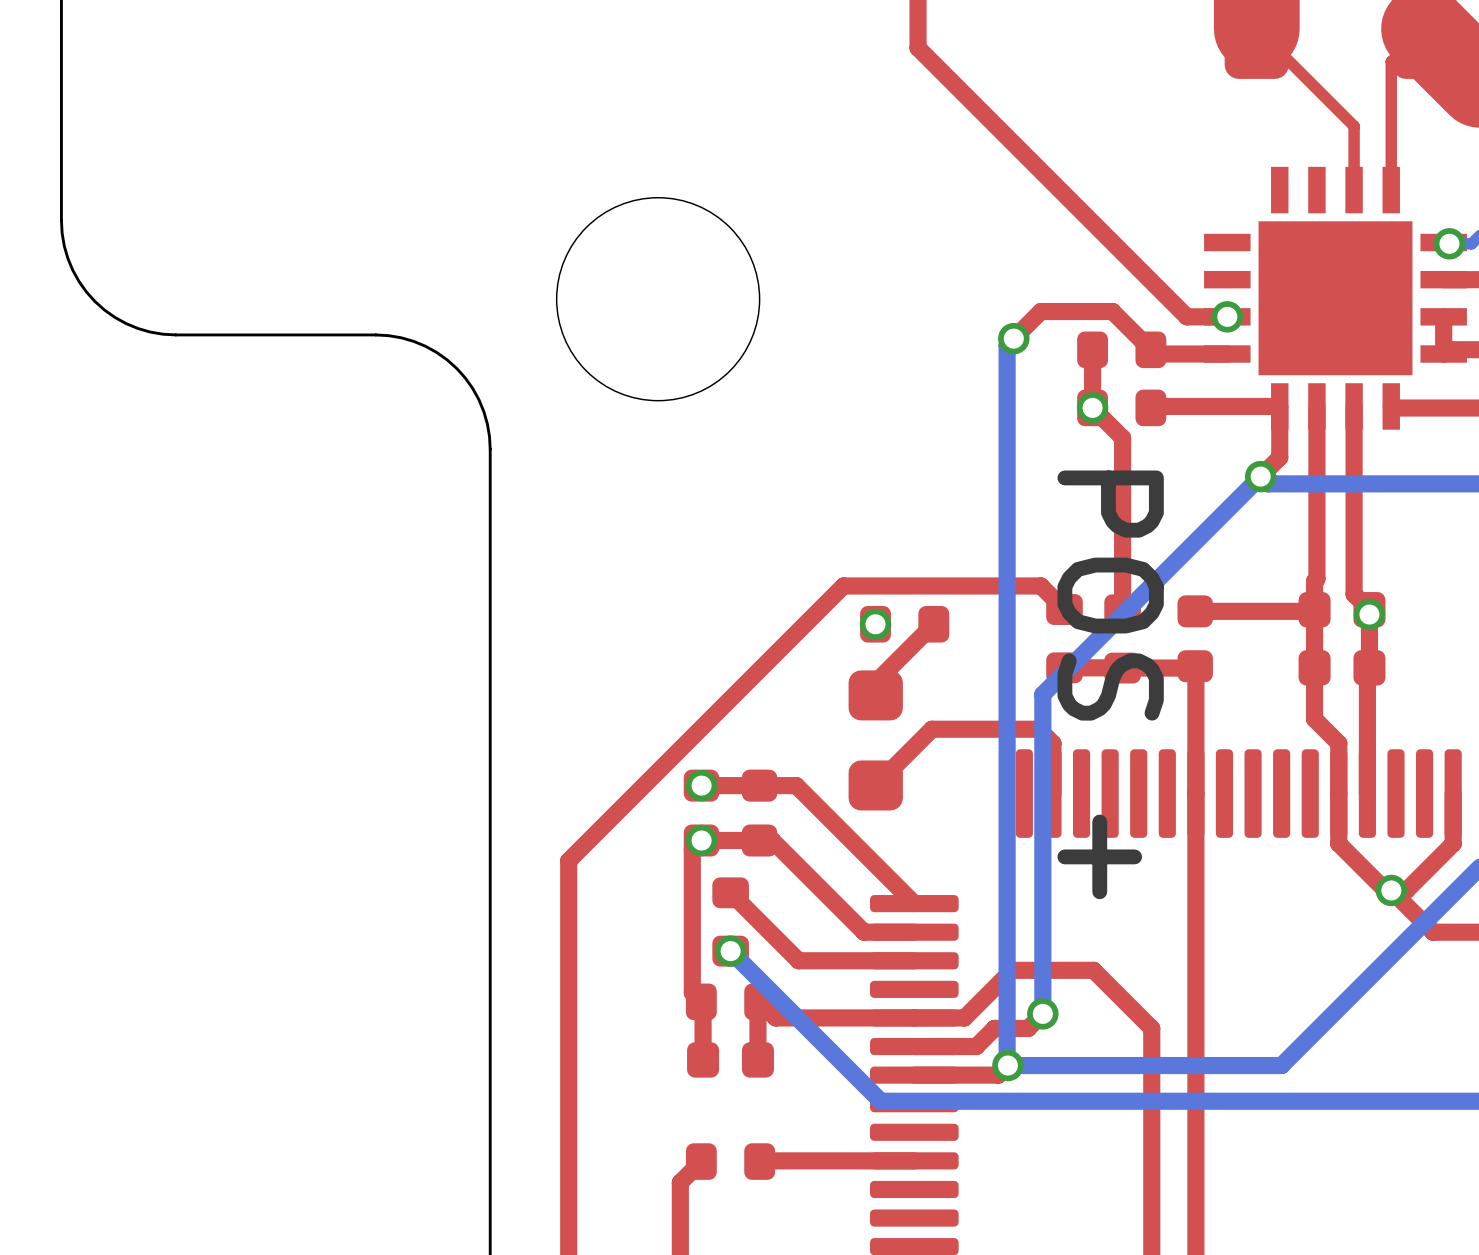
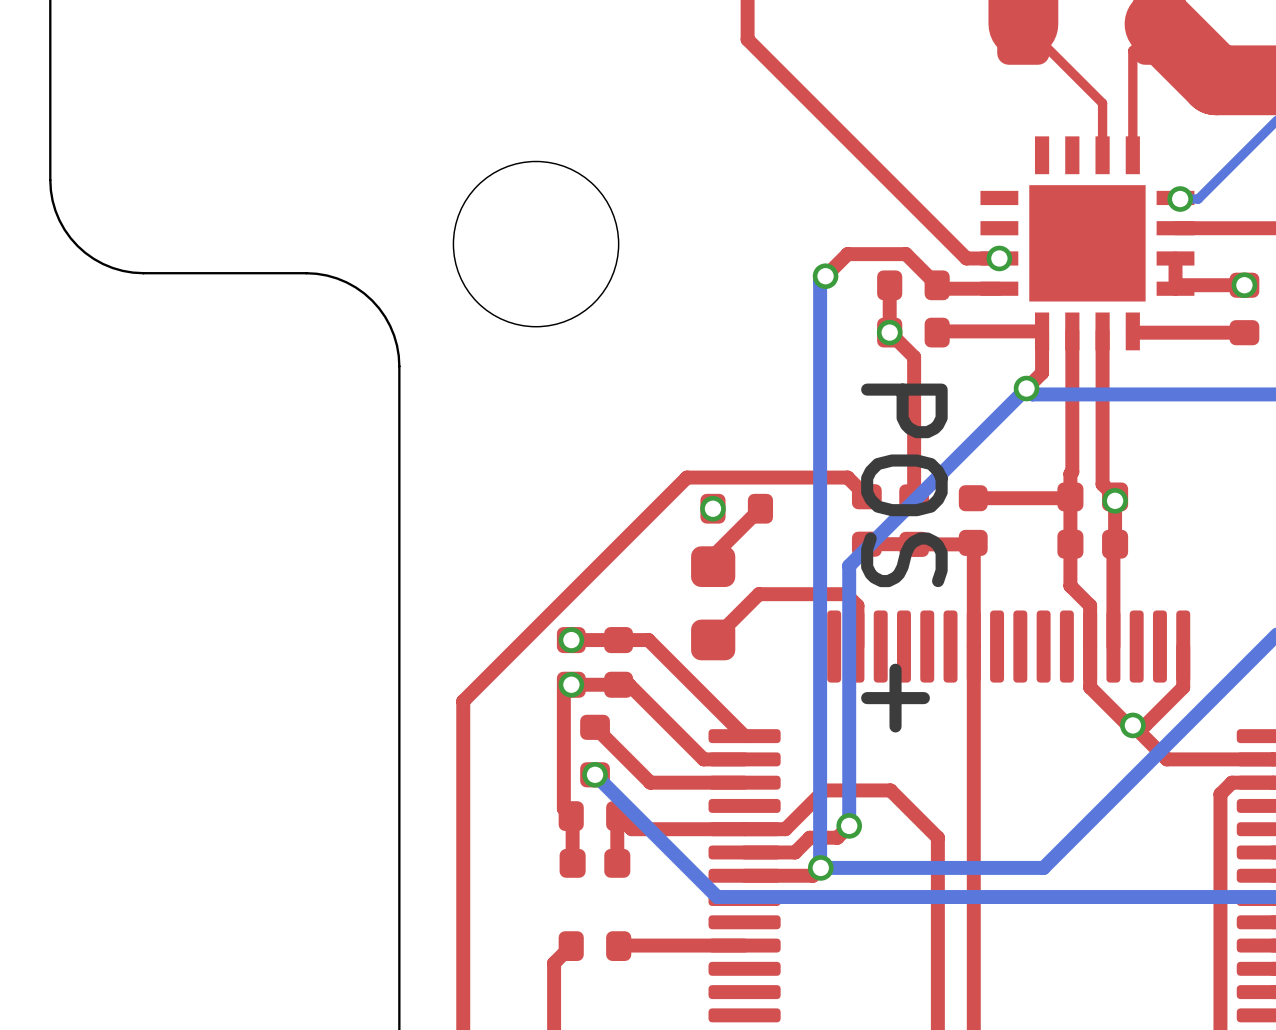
part footprint: [1204, 166, 1467, 430] -> [980, 136, 1195, 351]

